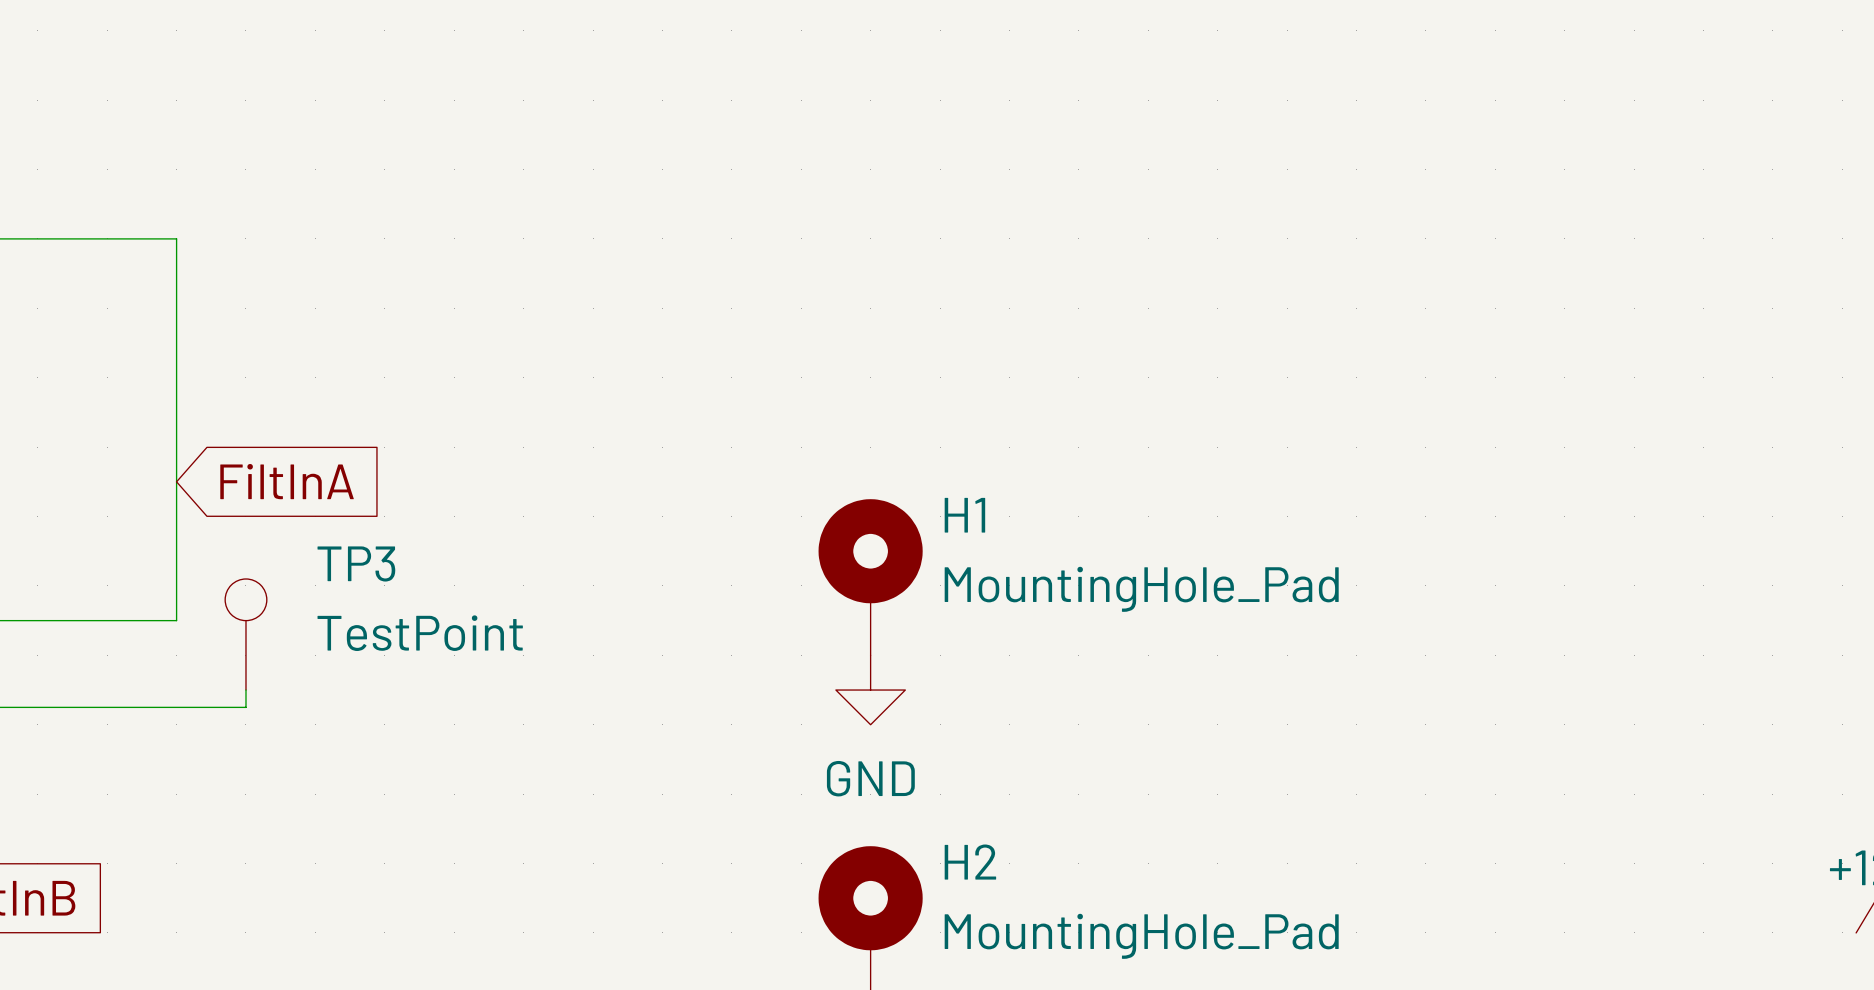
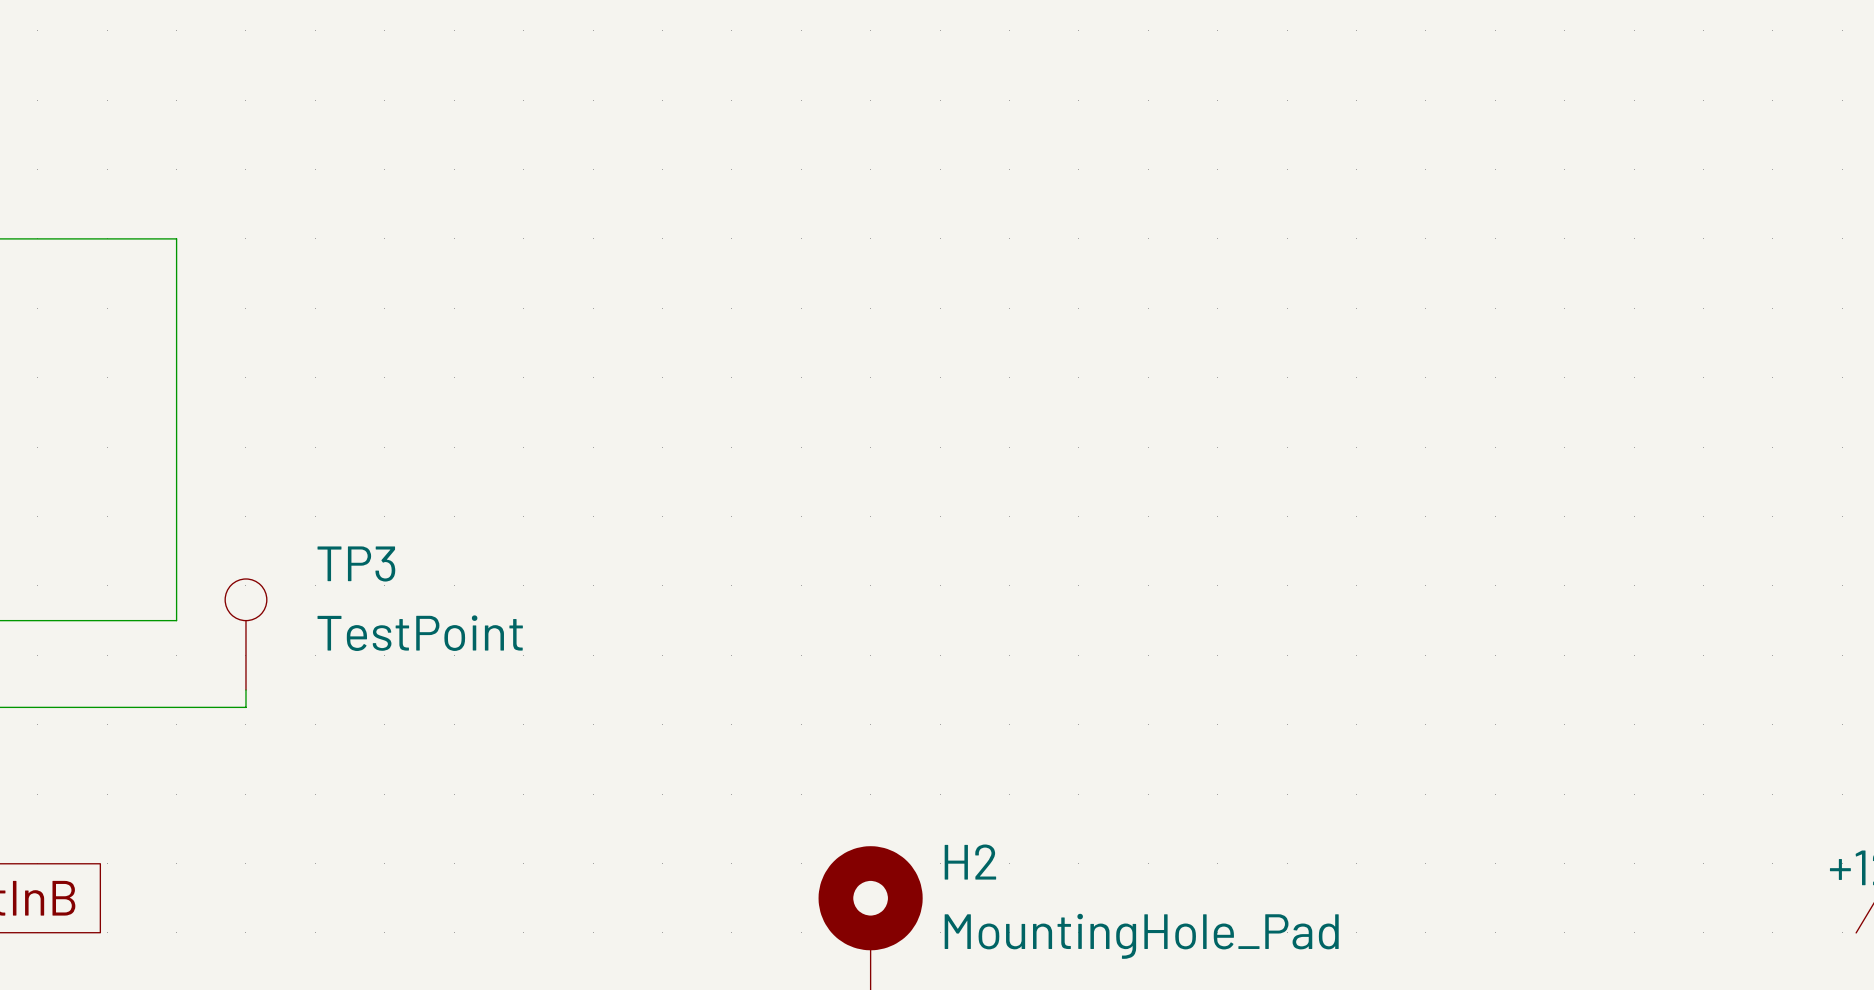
global label: FiltInA (287, 481) -> none
H1: MountingHole_Pad (870, 577) -> none
power symbol: GND (870, 690) -> none

